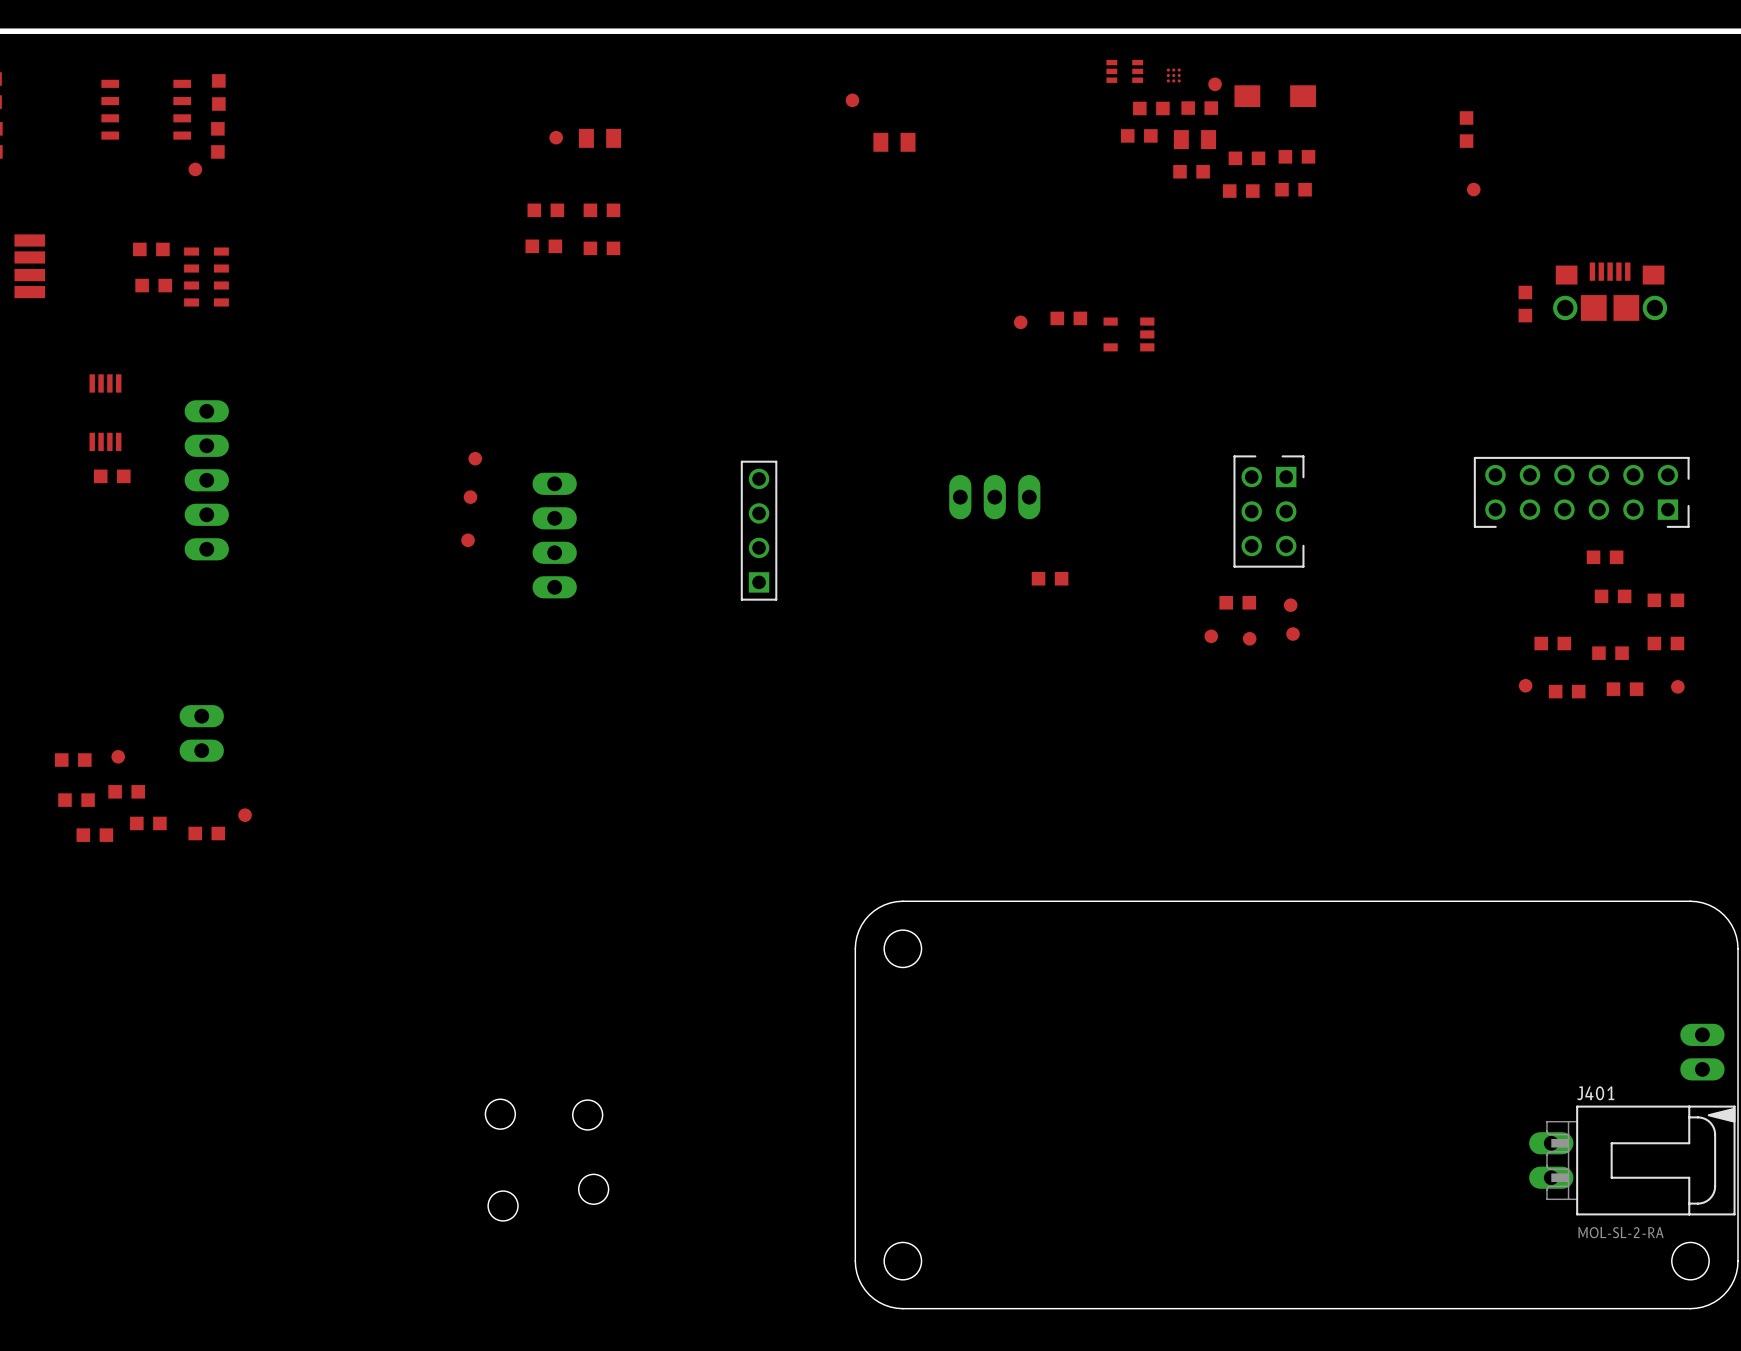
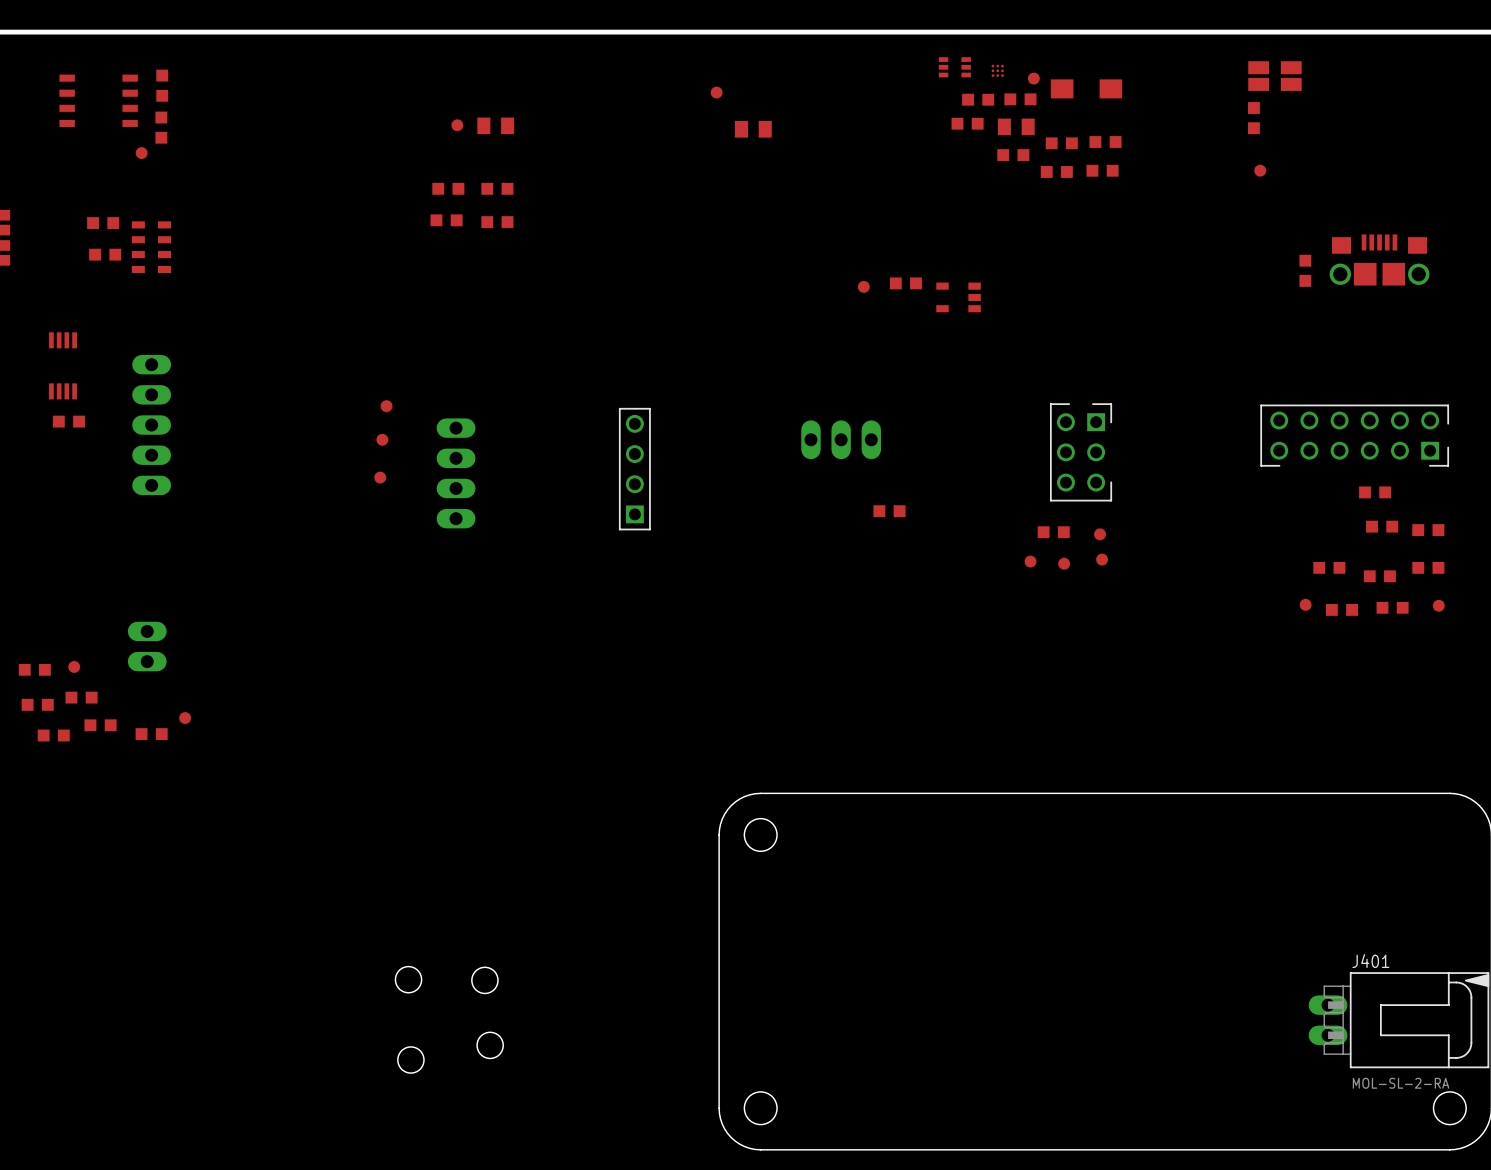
part: none -> (1274, 76)
part: (1702, 1052) -> none

